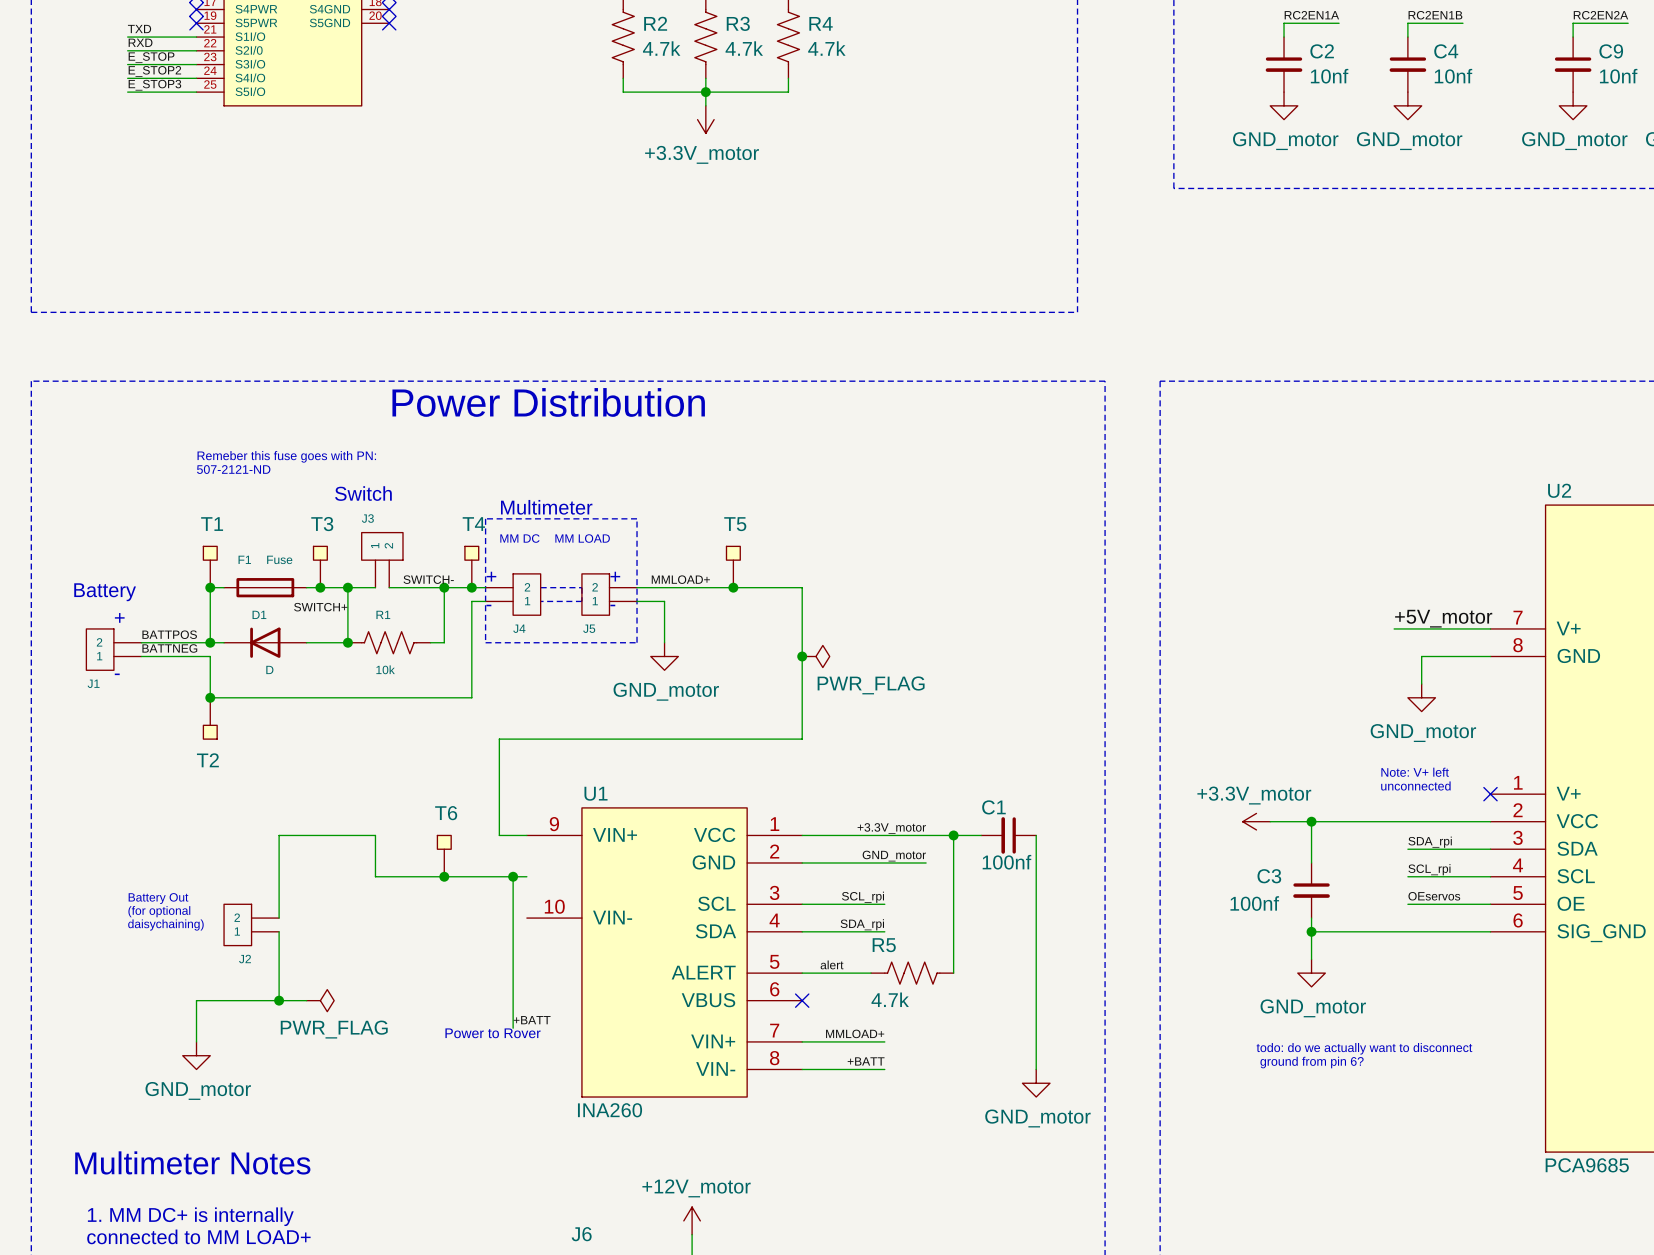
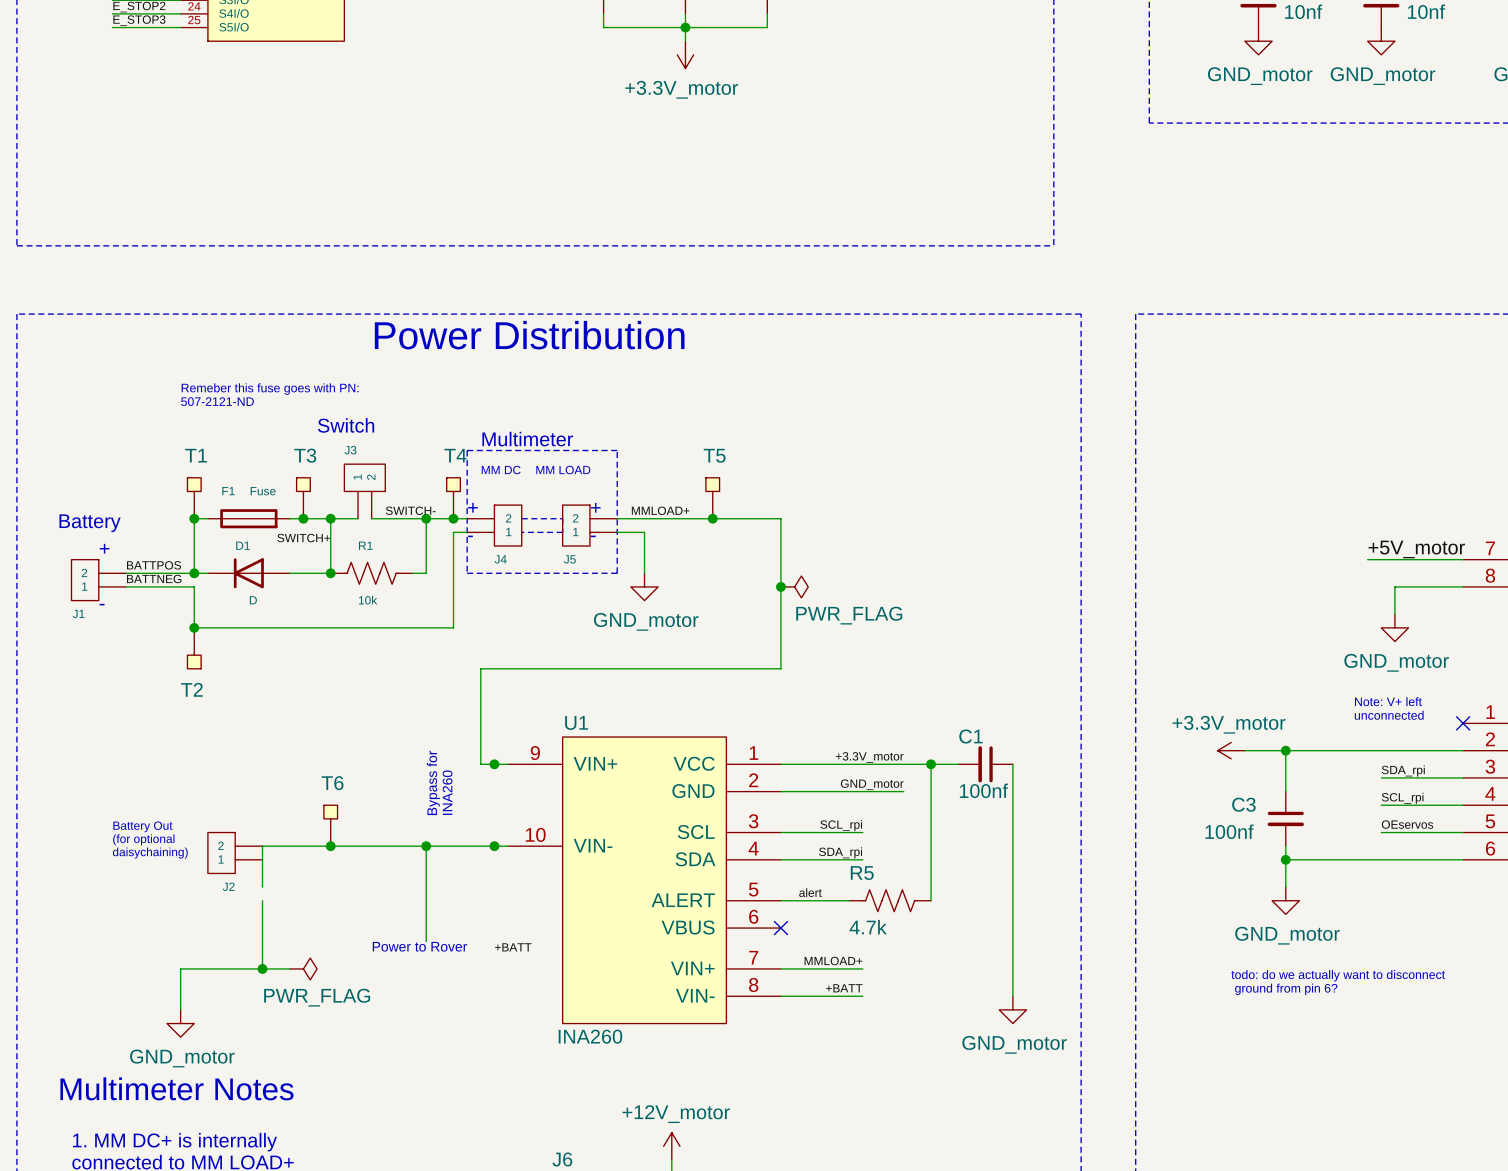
junction: none -> (494, 764)
text: none -> Bypass for (433, 782)
T6 position: (444, 856) -> (330, 825)
text: none -> INA260 (447, 792)
junction: (444, 876) -> none
wire: (513, 876) (513, 1028) -> none
junction: (513, 876) -> none
wire: (526, 876) (375, 876) (375, 835) (279, 835) (279, 918) -> none
junction: none -> (330, 846)
wire: none -> (426, 846) (426, 941)
junction: none -> (426, 846)
junction: none -> (494, 846)
wire: none -> (508, 846) (262, 846) (262, 859)
wire: (279, 959) (279, 973) -> none
wire: none -> (262, 928) (262, 968)
junction position: (279, 1000) -> (262, 968)
wire: (306, 1000) (196, 1000) (196, 1041) -> (289, 968) (180, 968) (180, 1009)
power symbol position: PWR_FLAG (320, 1000) -> PWR_FLAG (303, 968)
text position: Power to Rover (493, 1033) -> Power to Rover (419, 946)
power symbol position: GND_motor (196, 1055) -> GND_motor (180, 1023)

